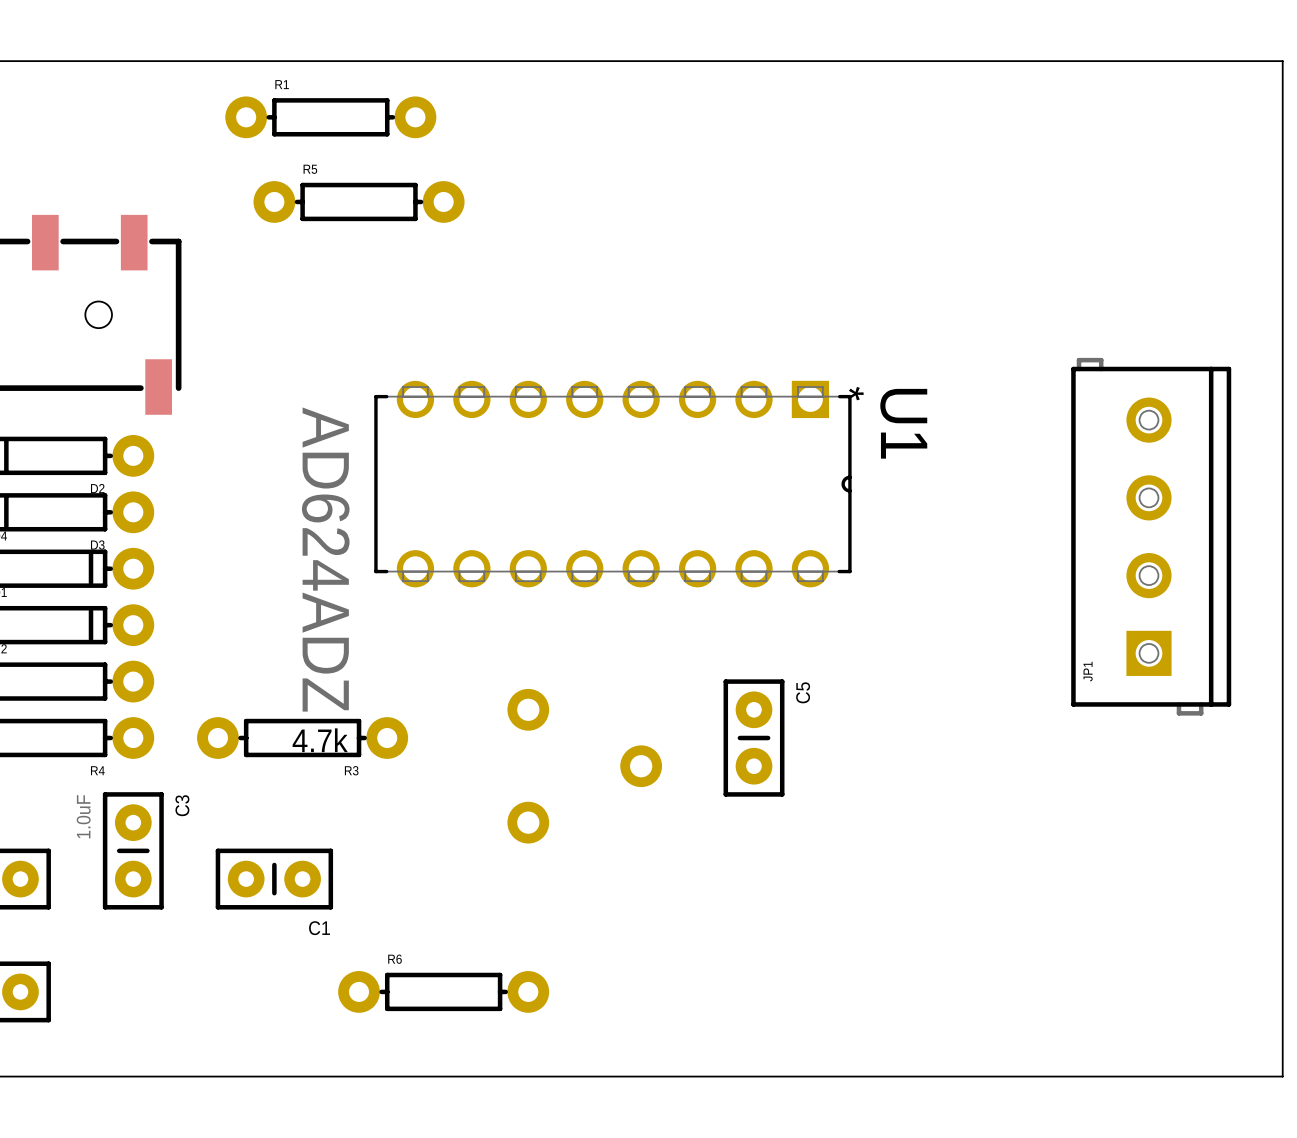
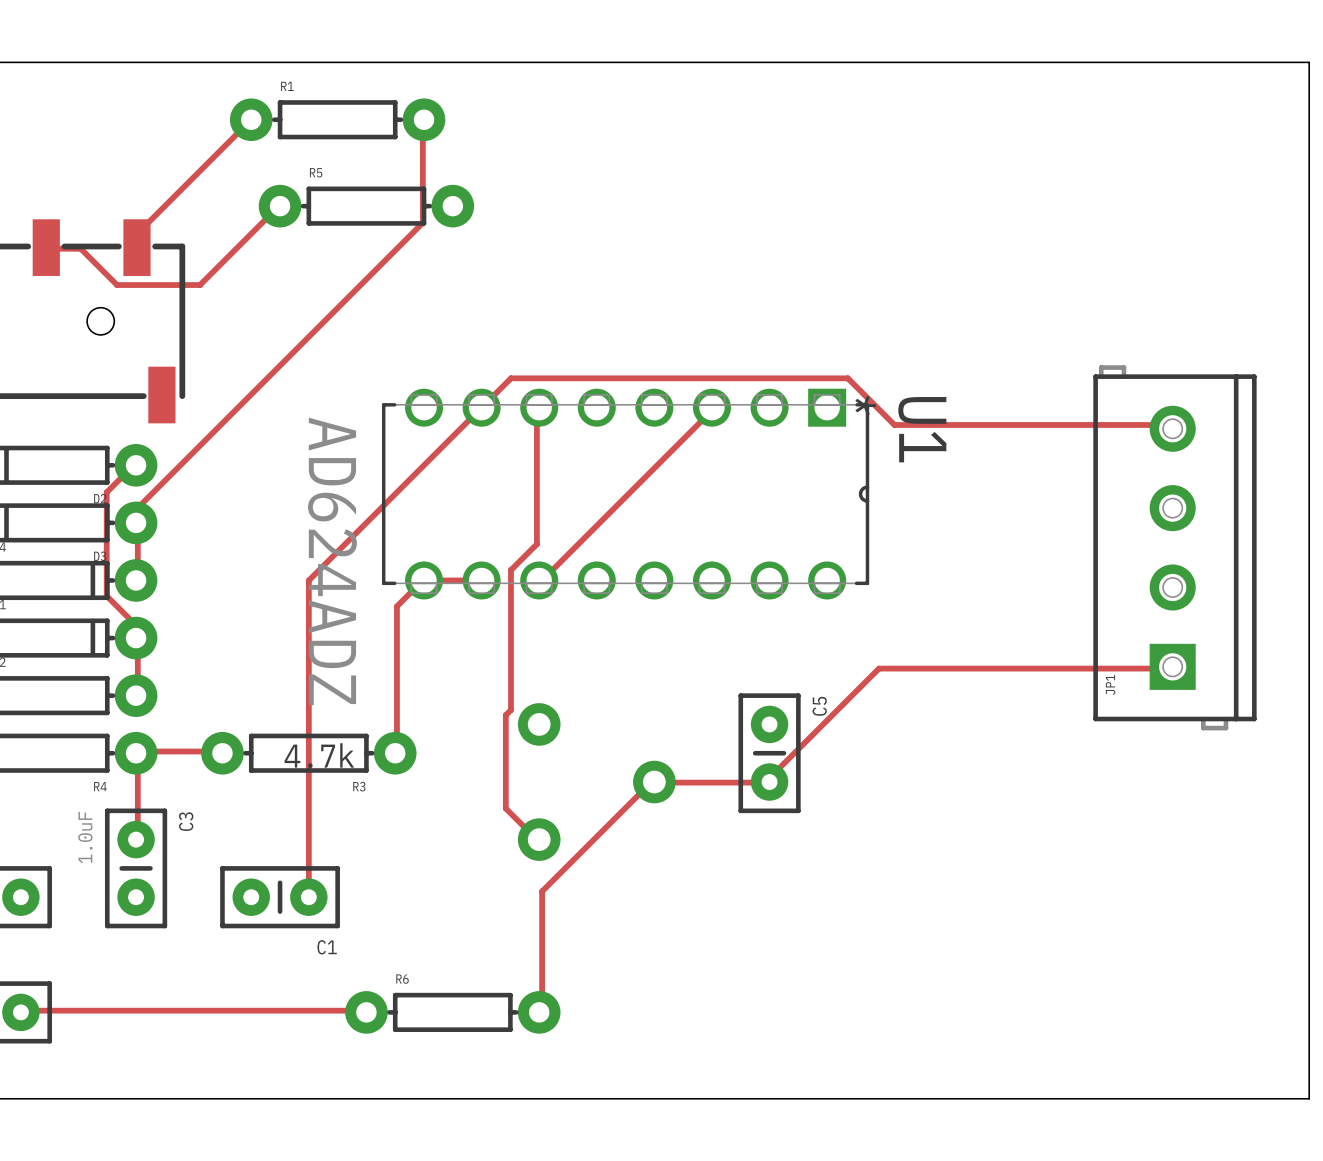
track: none -> (251, 119) (137, 233) (136, 247)
track: none -> (424, 119) (422, 222) (137, 507) (136, 522) (137, 523) (137, 580) (136, 580)
track: none -> (280, 206) (200, 285) (117, 285) (80, 248) (46, 247)
track: none -> (539, 407) (536, 409) (536, 544) (510, 570) (510, 710) (505, 715) (505, 808) (536, 839) (539, 839)
track: none -> (711, 407) (713, 409) (542, 580) (539, 580)
track: none -> (1172, 428) (1169, 424) (894, 424) (847, 378) (510, 378) (308, 580) (308, 897)
track: none -> (136, 465) (106, 492) (106, 596) (132, 621) (132, 637) (136, 638) (137, 642) (137, 694) (136, 695)
track: none -> (481, 580) (422, 580) (396, 606) (396, 751) (395, 753)
track: none -> (1172, 666) (1169, 668) (878, 668) (770, 777) (769, 782) (650, 782) (542, 891) (542, 1010) (539, 1012)
track: none -> (222, 753) (220, 751) (137, 751) (136, 753) (137, 756) (137, 839) (136, 839)
track: none -> (20, 1012) (23, 1010) (365, 1010) (366, 1012)

